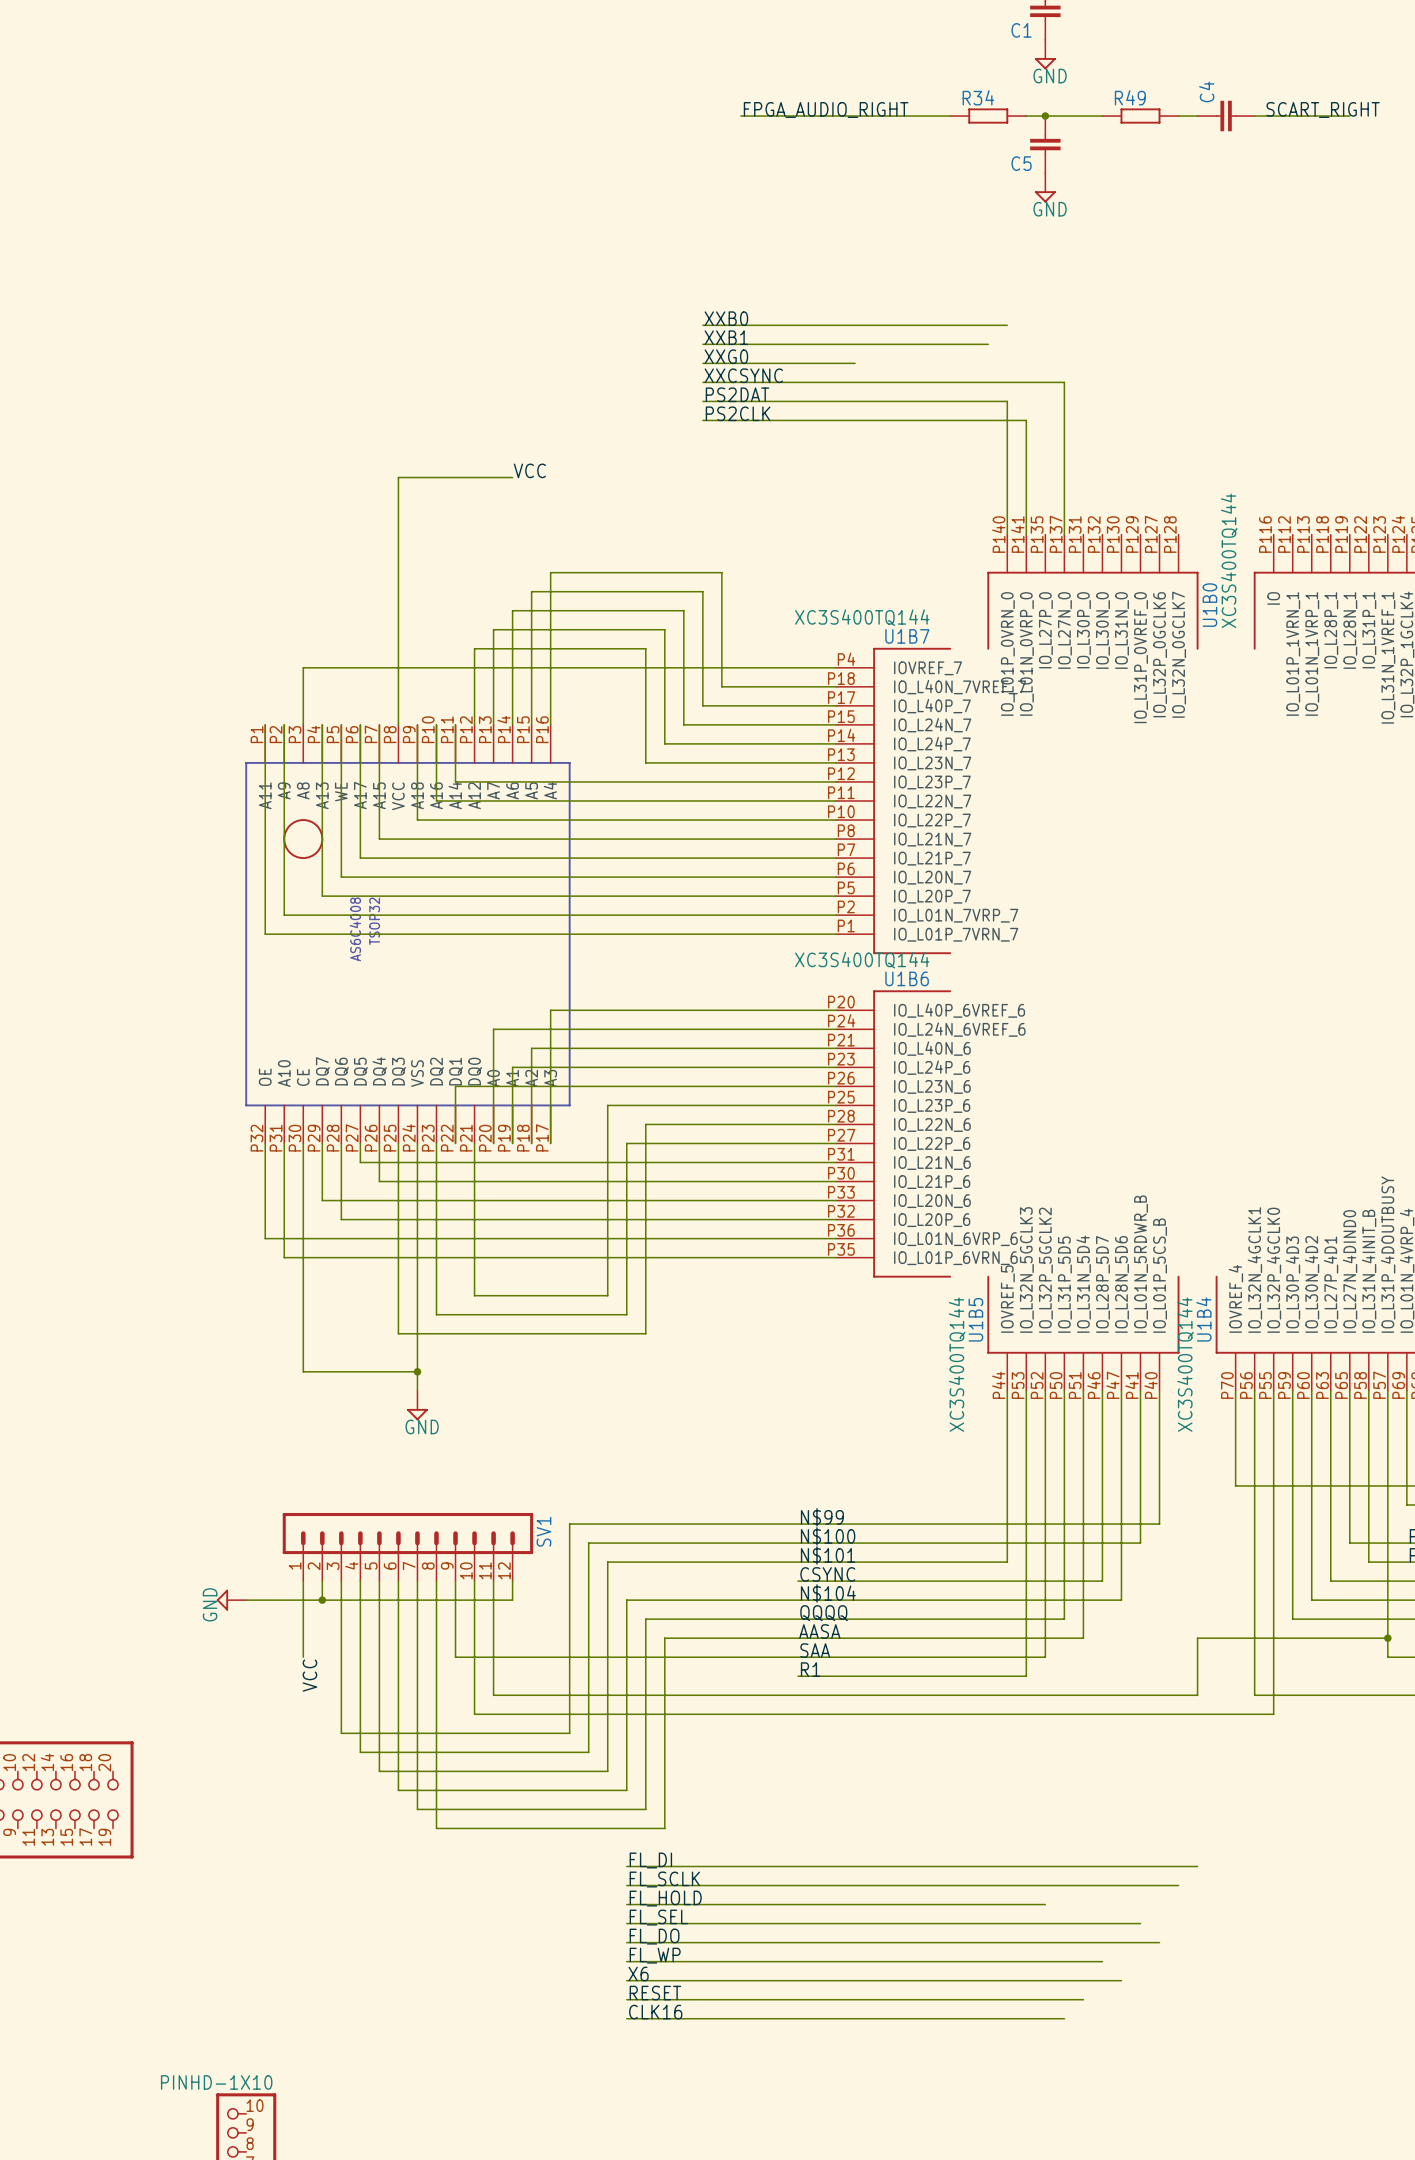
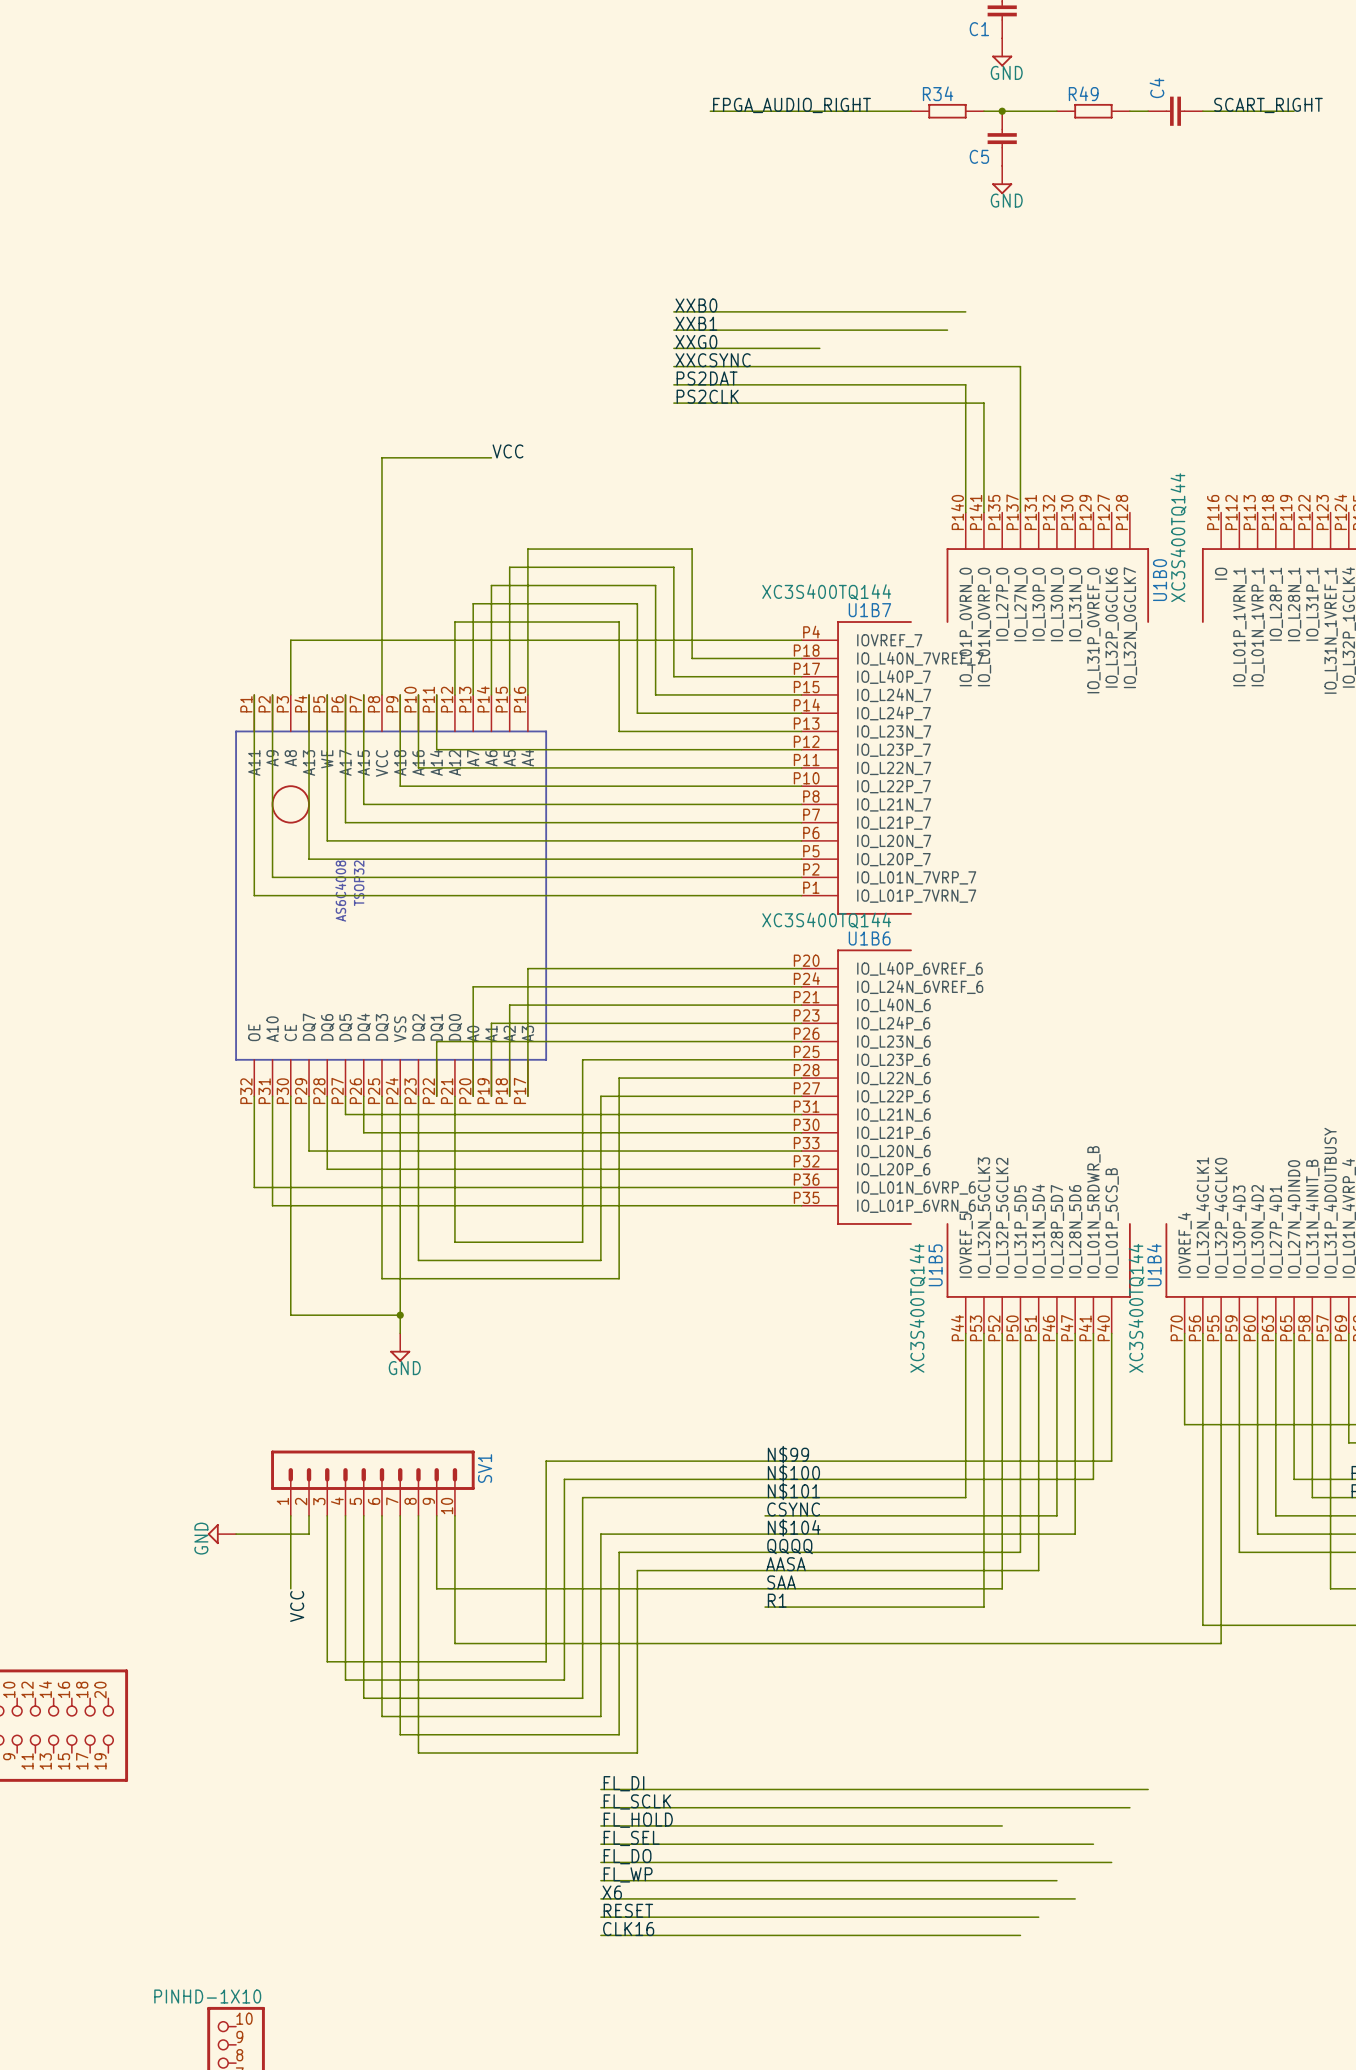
SV1 symbol: [282, 1512, 534, 1582] -> [271, 1450, 475, 1516]
SV1 name position: SV1 (543, 1531) -> SV1 (485, 1468)
wire: (493, 1581) (493, 1695) (1197, 1695) (1197, 1638) (1387, 1638) -> none
wire: (512, 1581) (512, 1600) (322, 1600) -> none
junction: (322, 1600) -> none
junction: (1387, 1638) -> none

